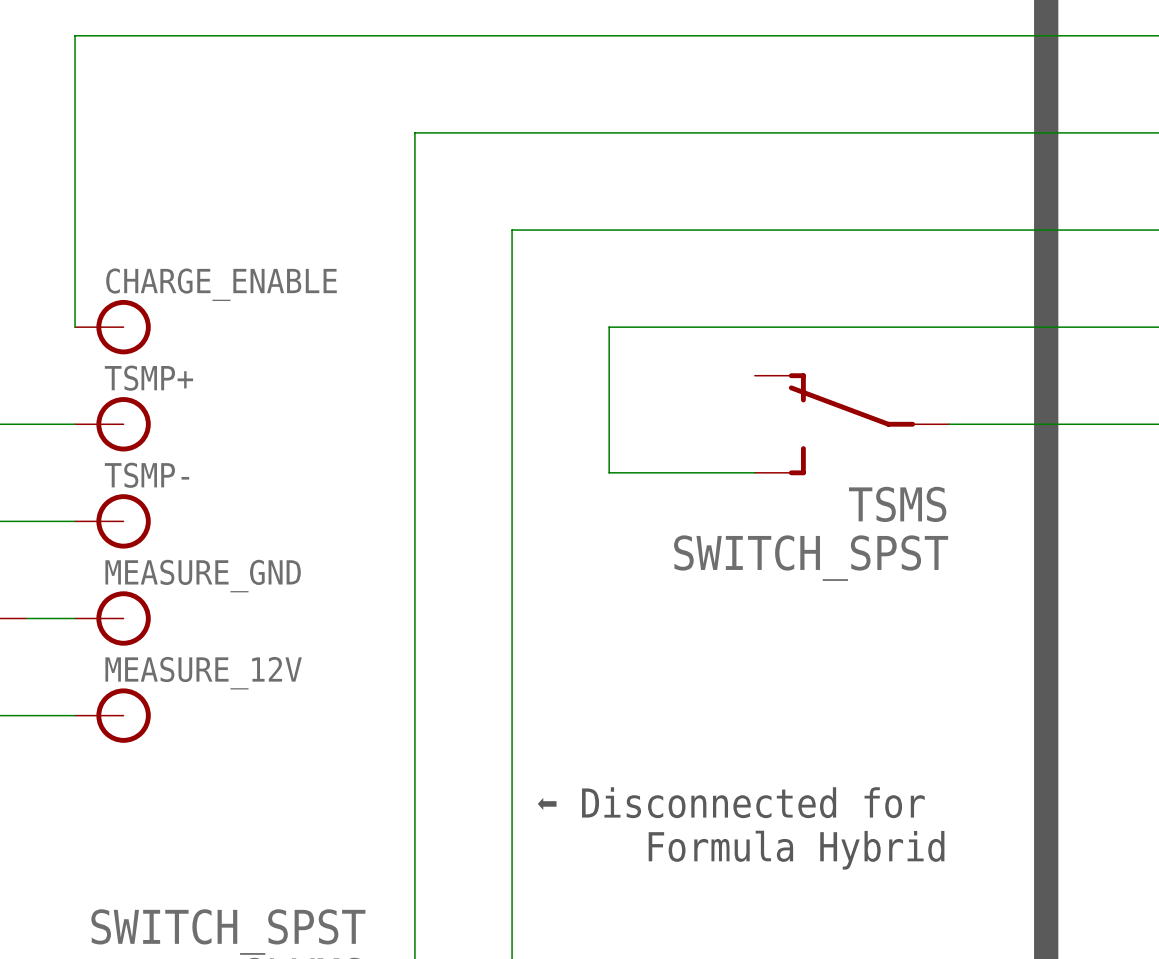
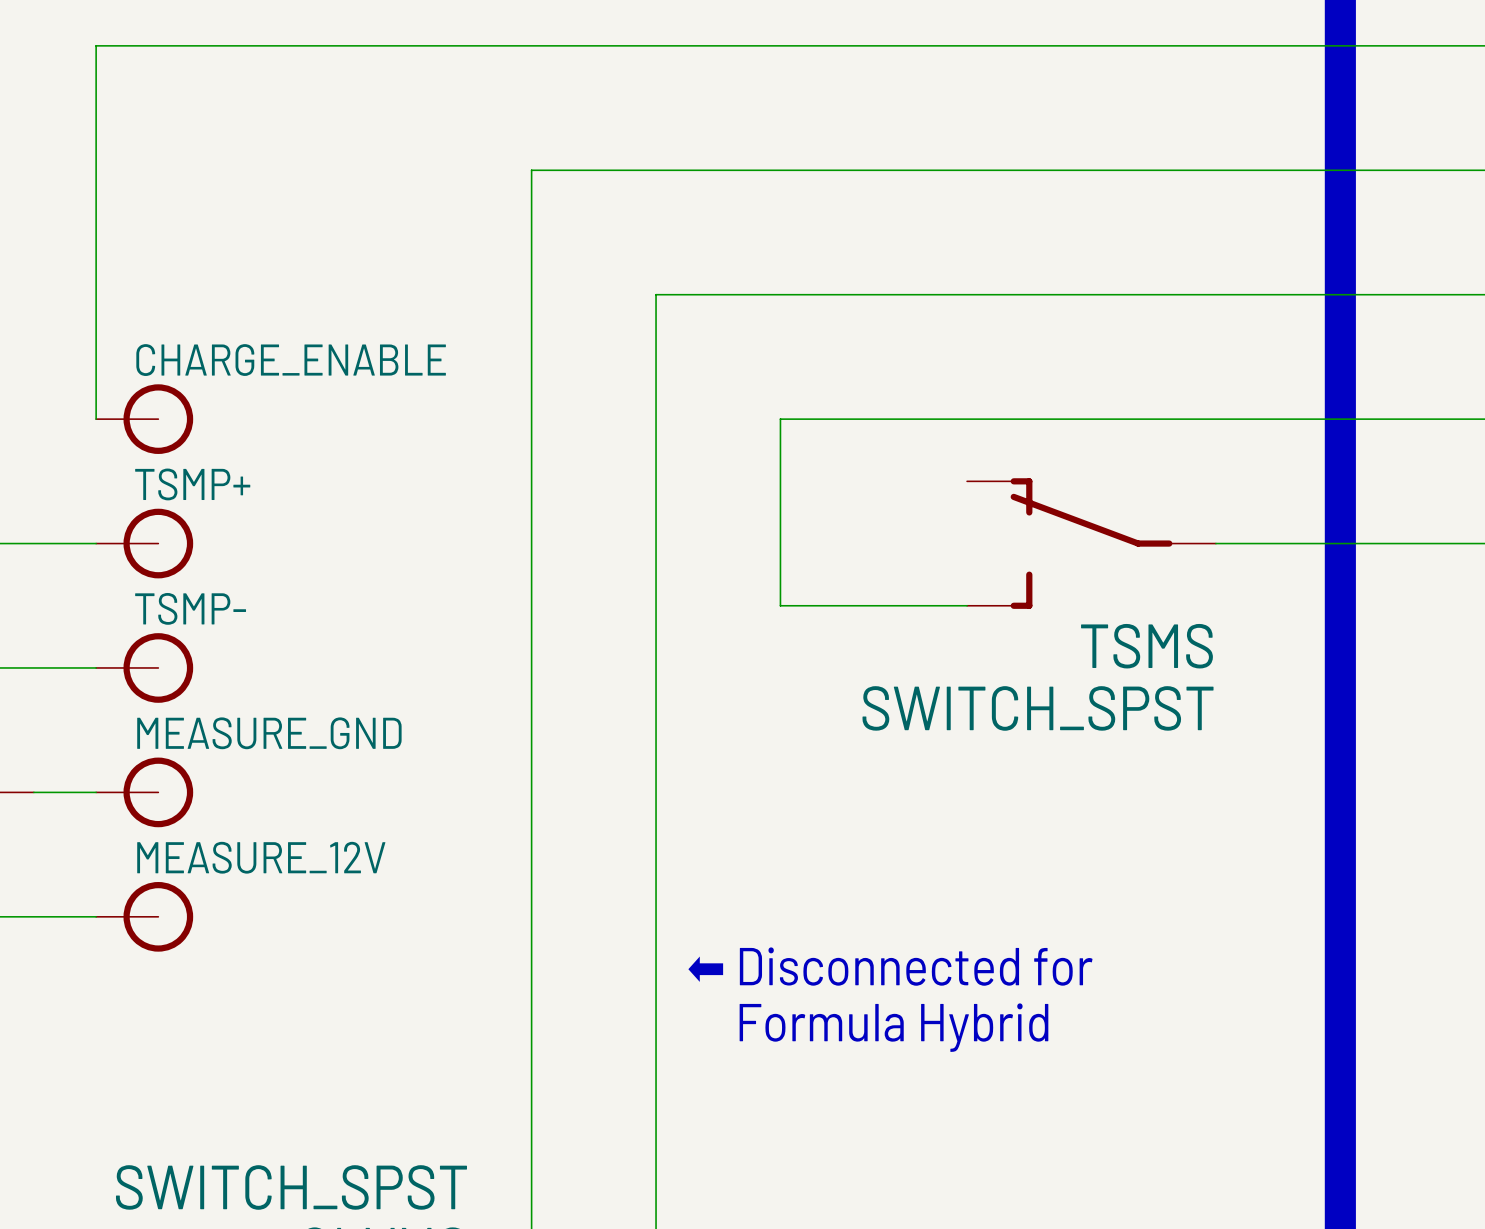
text: none -> ⬅ Disconnected for (890, 966)
text: ⬅ Disconnected for (731, 802) -> Formula Hybrid (893, 1027)
text: Formula Hybrid (796, 850) -> none

